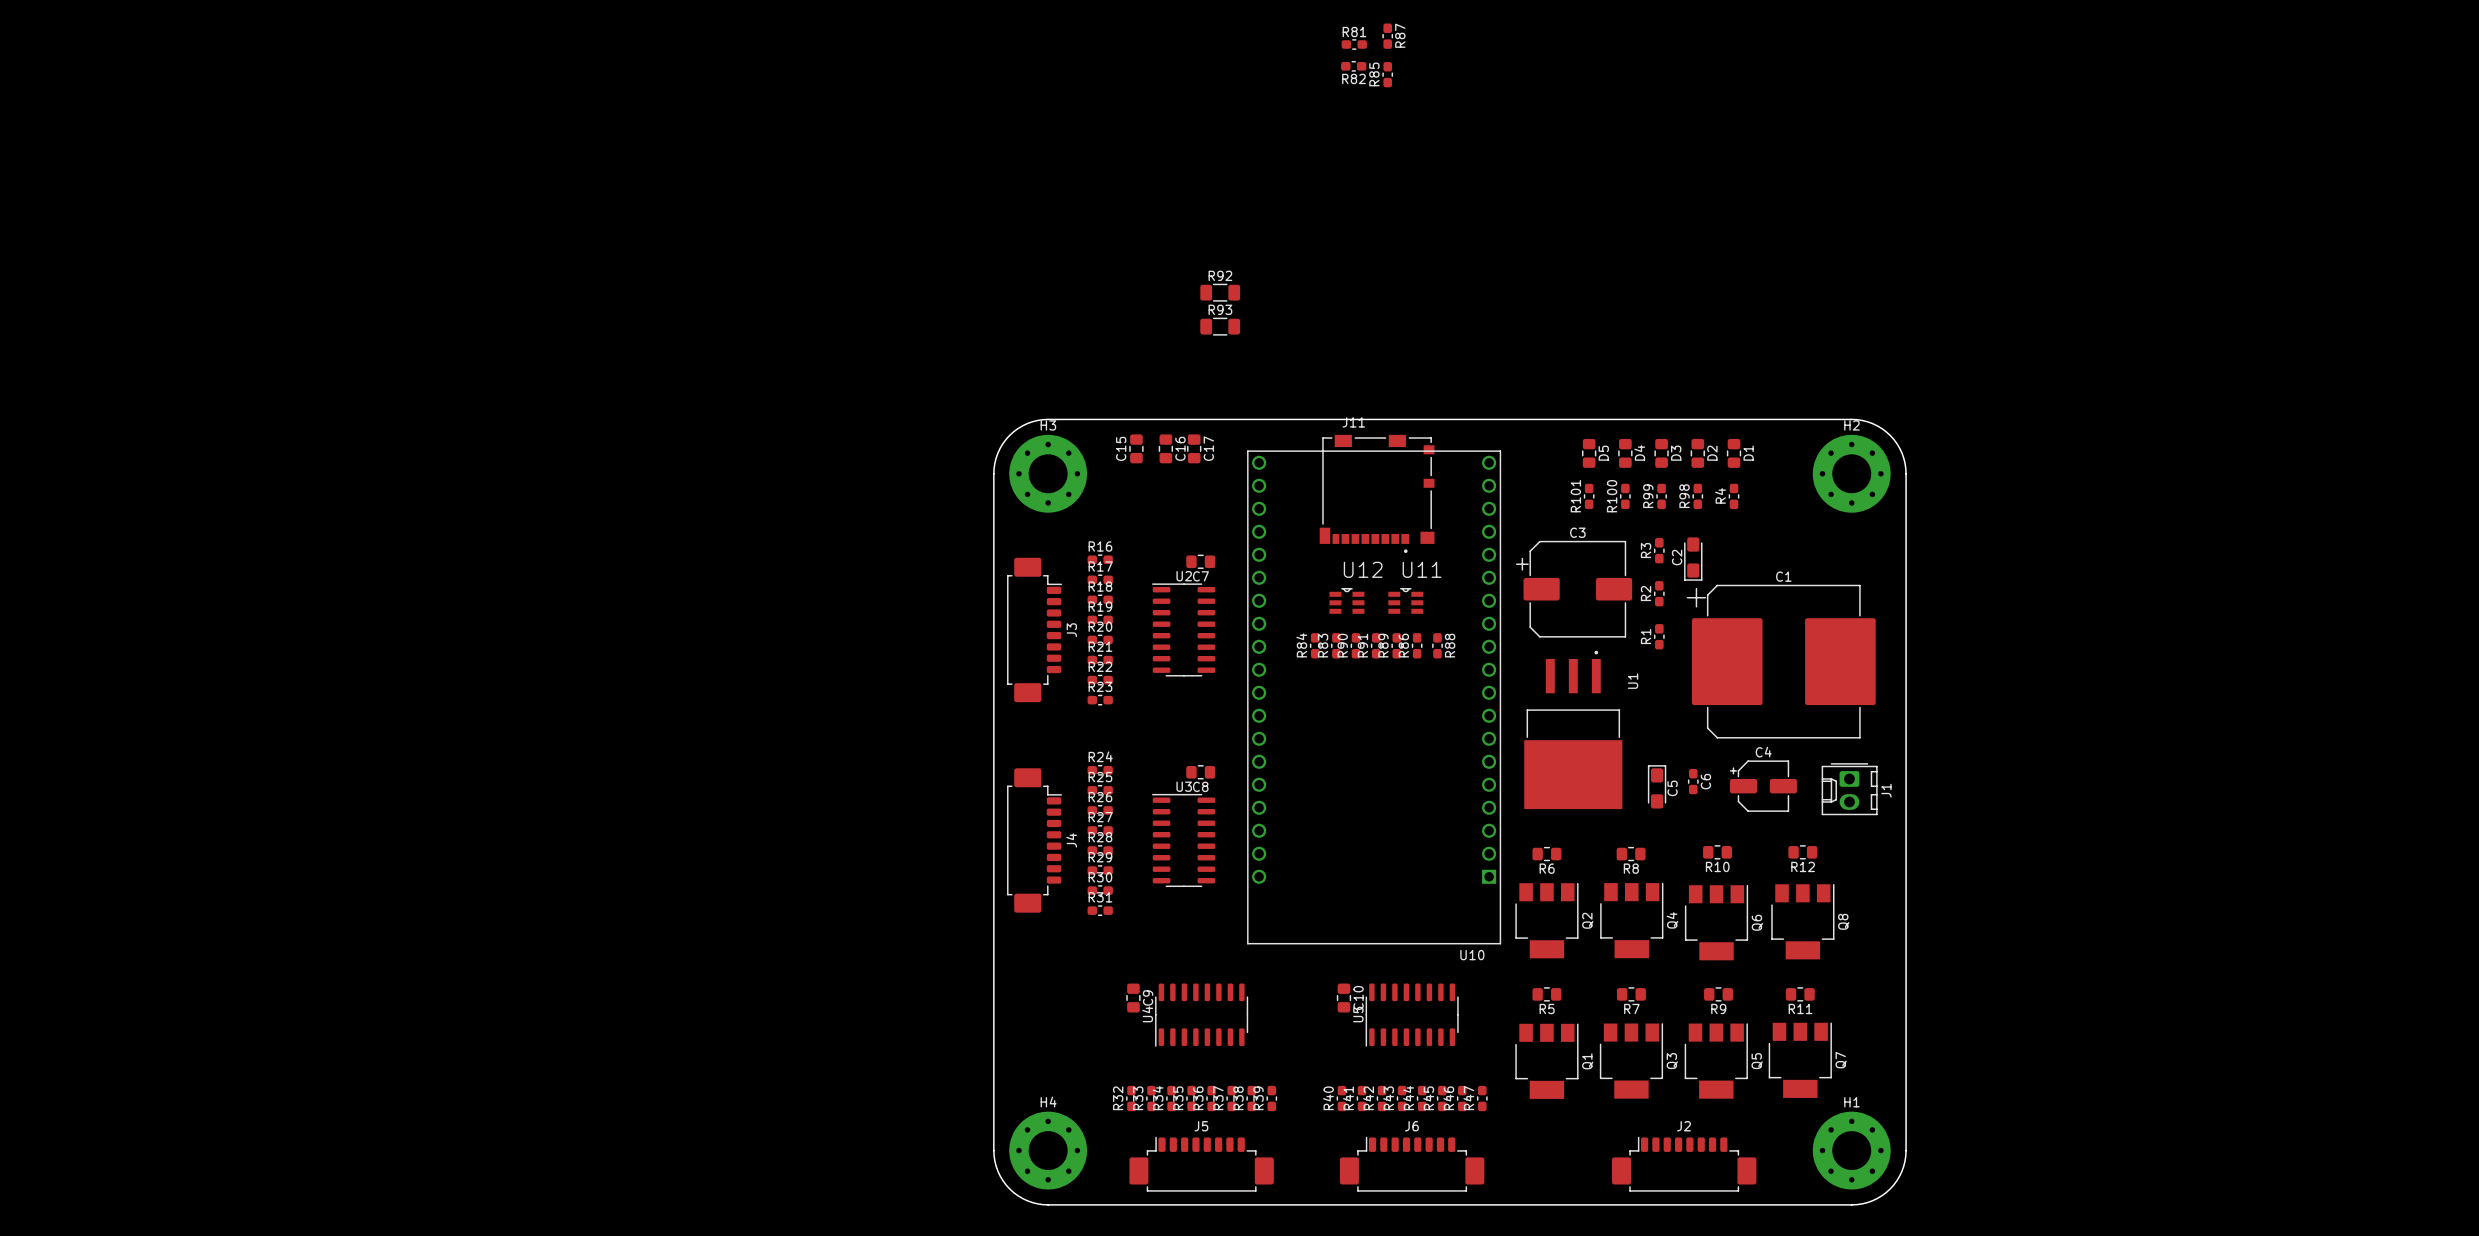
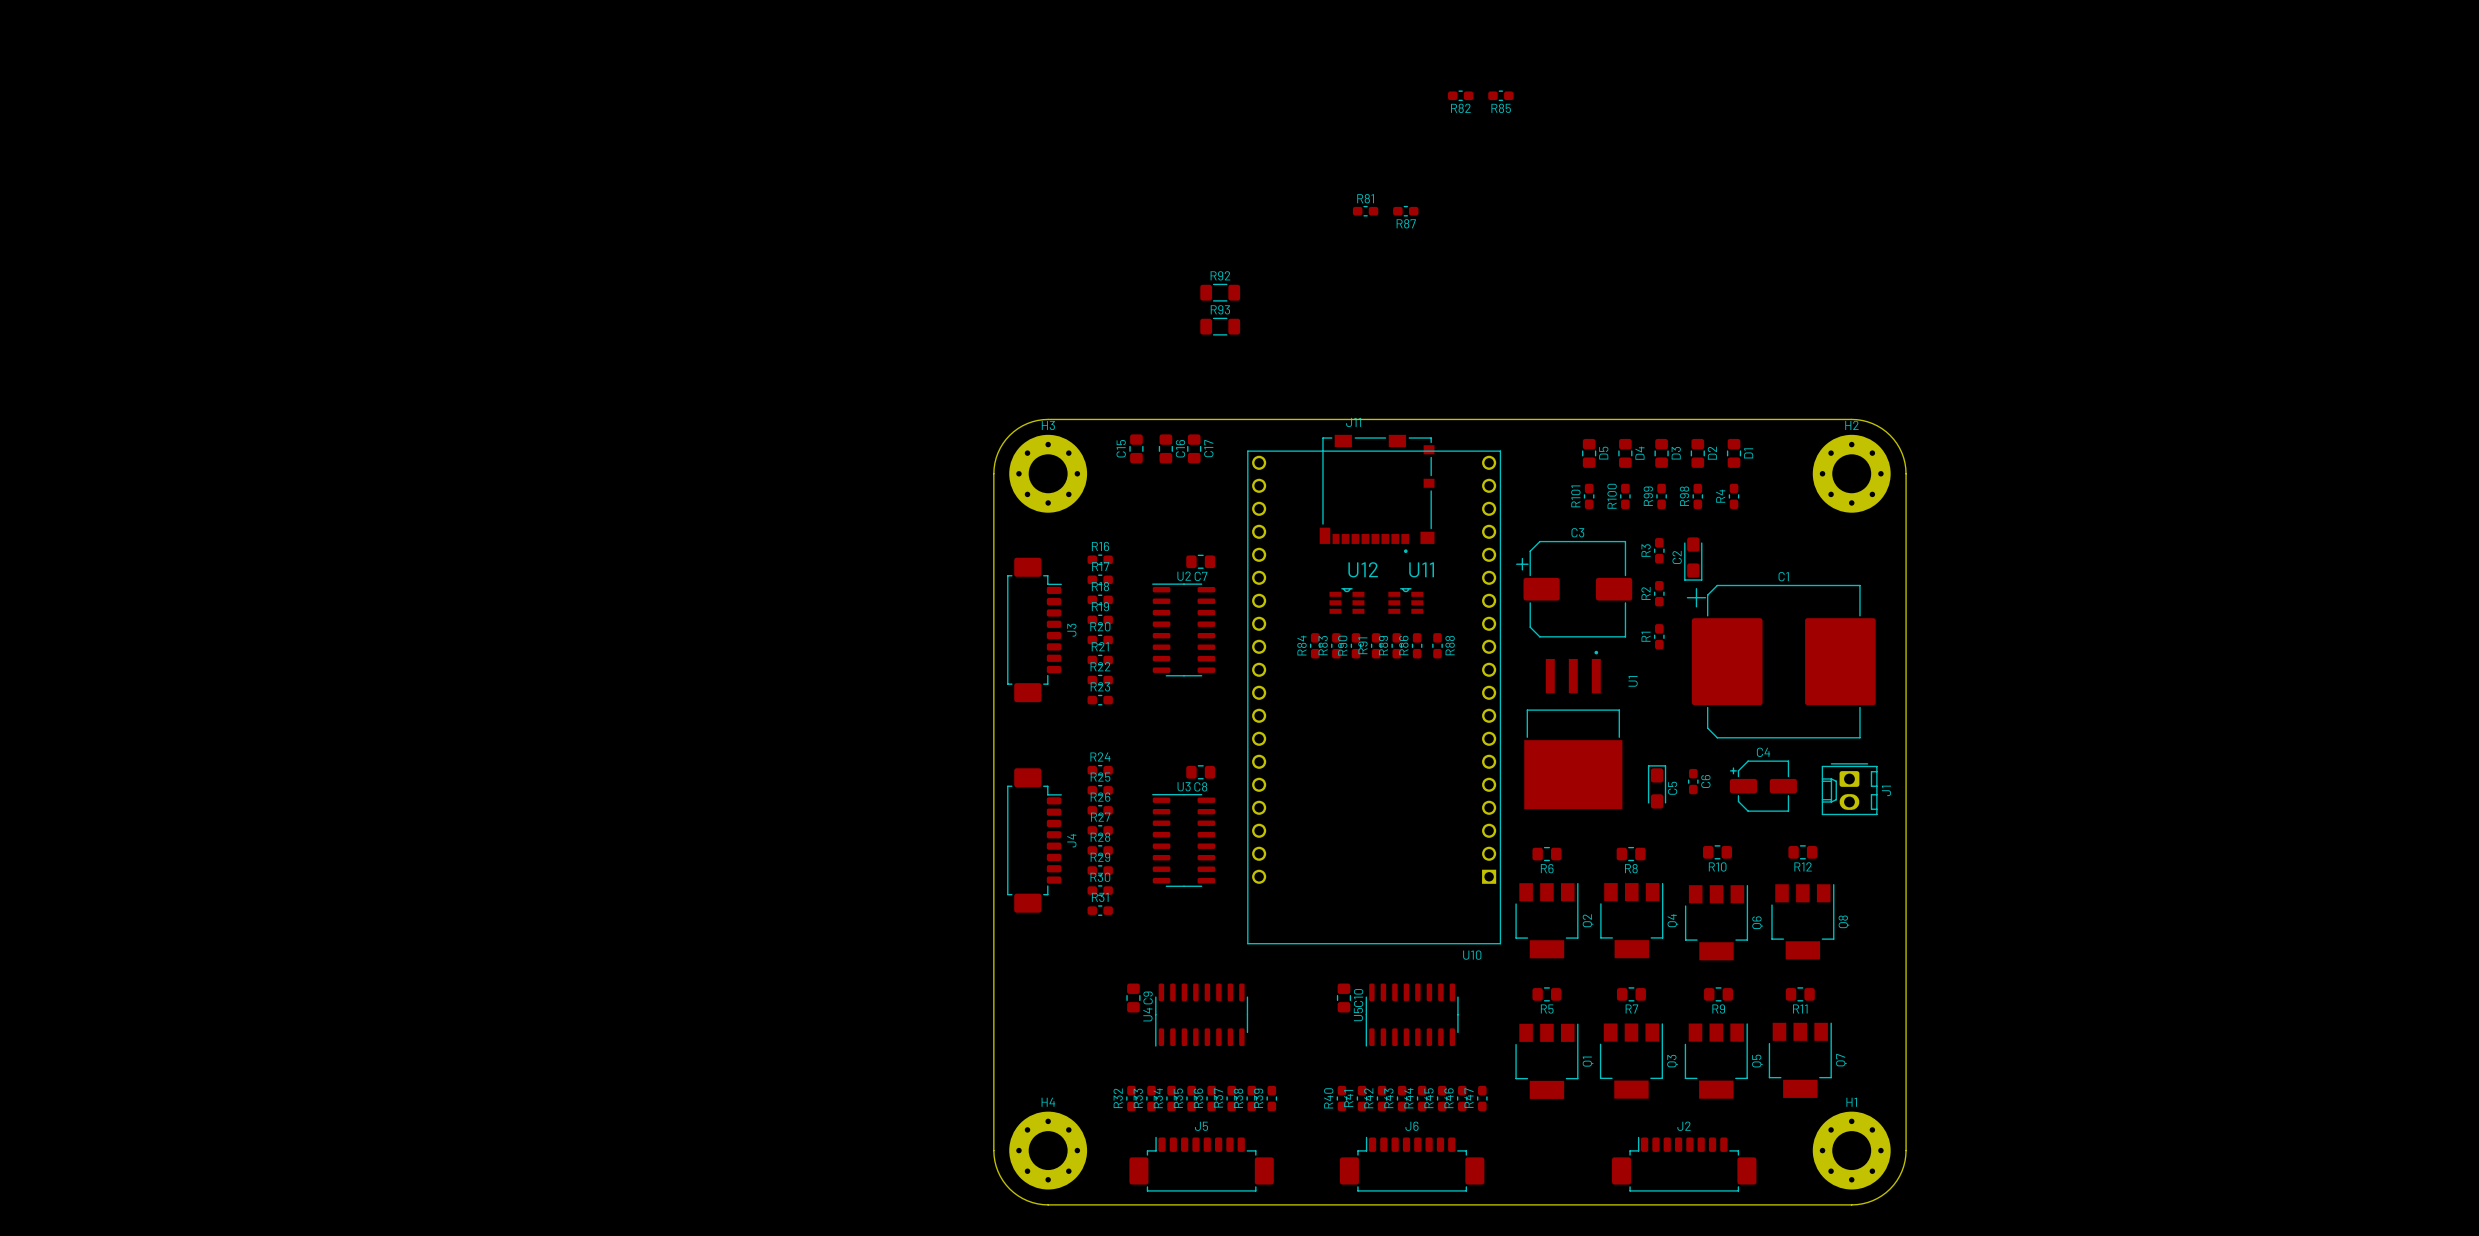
R87 rotation: 0° (1387, 36) -> 90° clockwise (1405, 211)
R87 position: (1387, 36) -> (1405, 211)
R81 position: (1354, 44) -> (1365, 211)
R82 position: (1353, 66) -> (1460, 95)
R85 name position: R85 (1374, 74) -> R85 (1501, 108)
R85 rotation: 0° (1387, 74) -> 90° clockwise (1500, 95)
R85 position: (1387, 74) -> (1500, 95)

